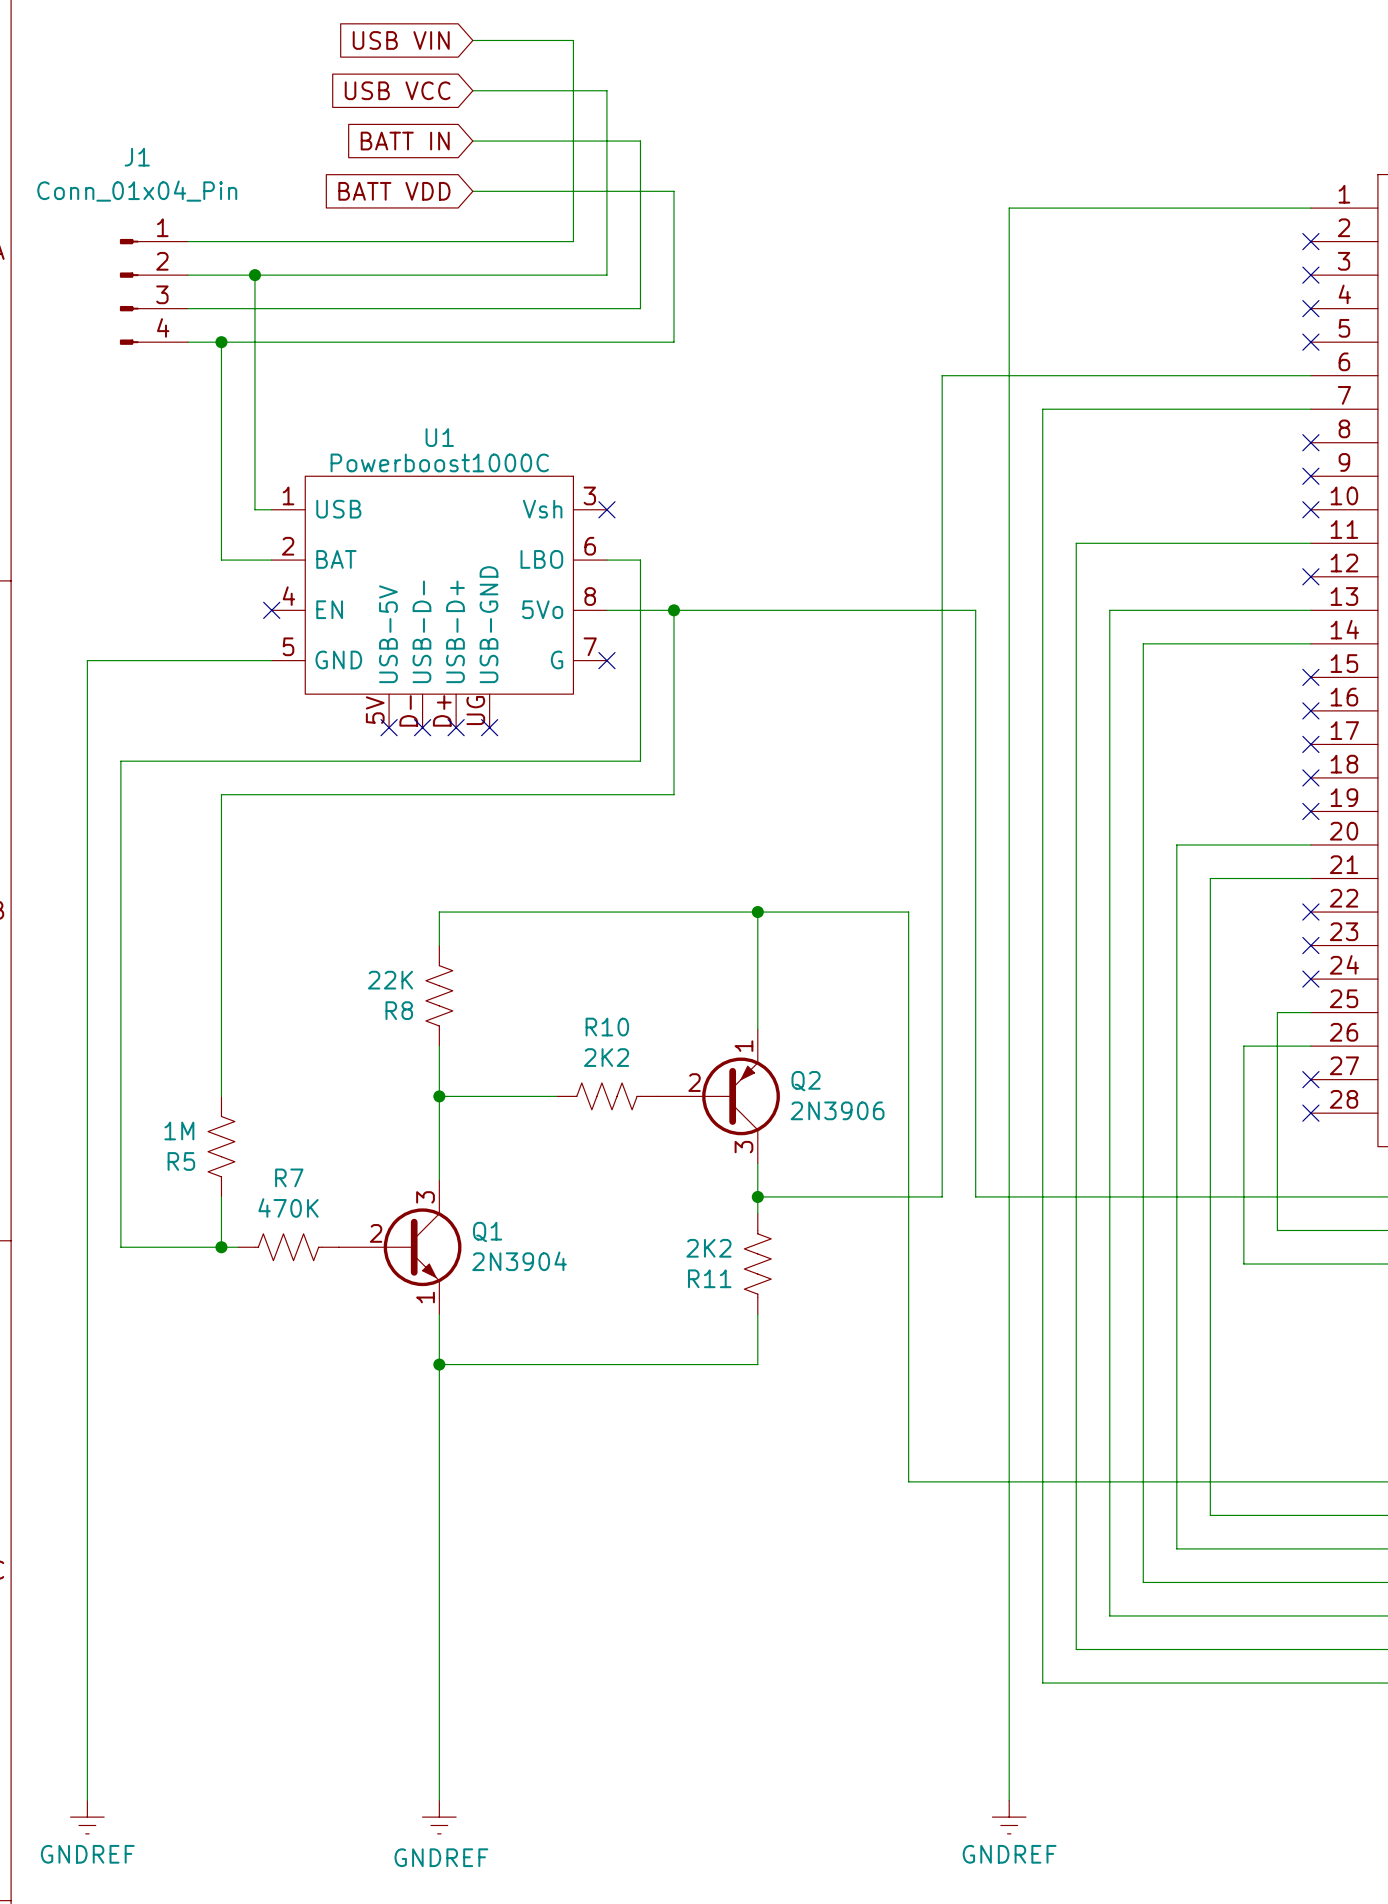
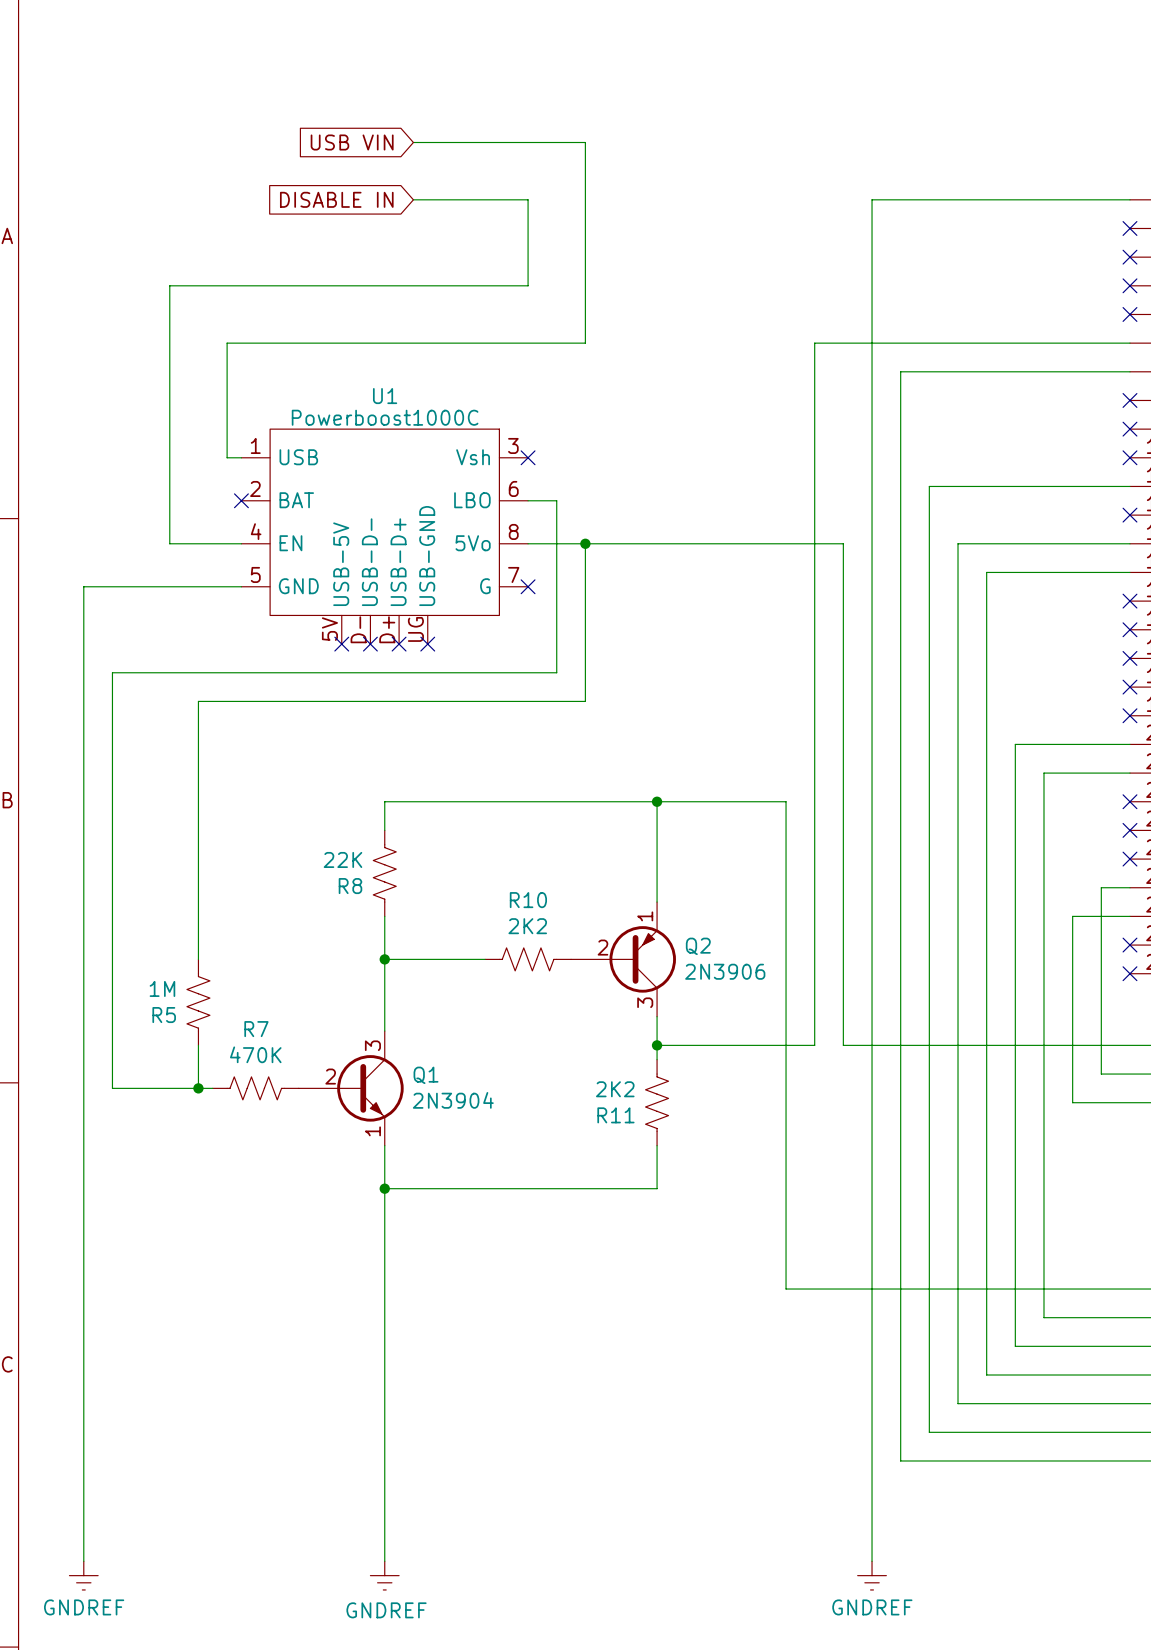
global label: USB VIN (401, 40) -> none
wire: (472, 40) (573, 40) (573, 241) (187, 241) -> none
global label: USB VCC (397, 90) -> none
wire: (472, 90) (606, 90) (606, 208) -> (413, 199) (528, 199)
global label: BATT IN (405, 141) -> USB VIN (352, 142)
wire: (640, 141) (640, 308) (606, 308) -> (556, 142) (585, 142) (585, 185)
global label: BATT VDD (394, 191) -> none
wire: (472, 191) (673, 191) -> none
global label: none -> DISABLE IN (336, 199)
wire: (187, 275) (606, 275) -> (528, 285) (528, 257)
wire: (254, 275) (254, 375) -> none
junction: (254, 275) -> none
J1: Conn_01x04_Pin (153, 291) -> none
wire: none -> (169, 285) (169, 543) (241, 543)
wire: (187, 342) (673, 342) -> (227, 343) (585, 343) (585, 314)
wire: (221, 342) (221, 560) (271, 560) -> none
junction: (221, 342) -> none
no-connect mark position: (271, 610) -> (241, 500)

